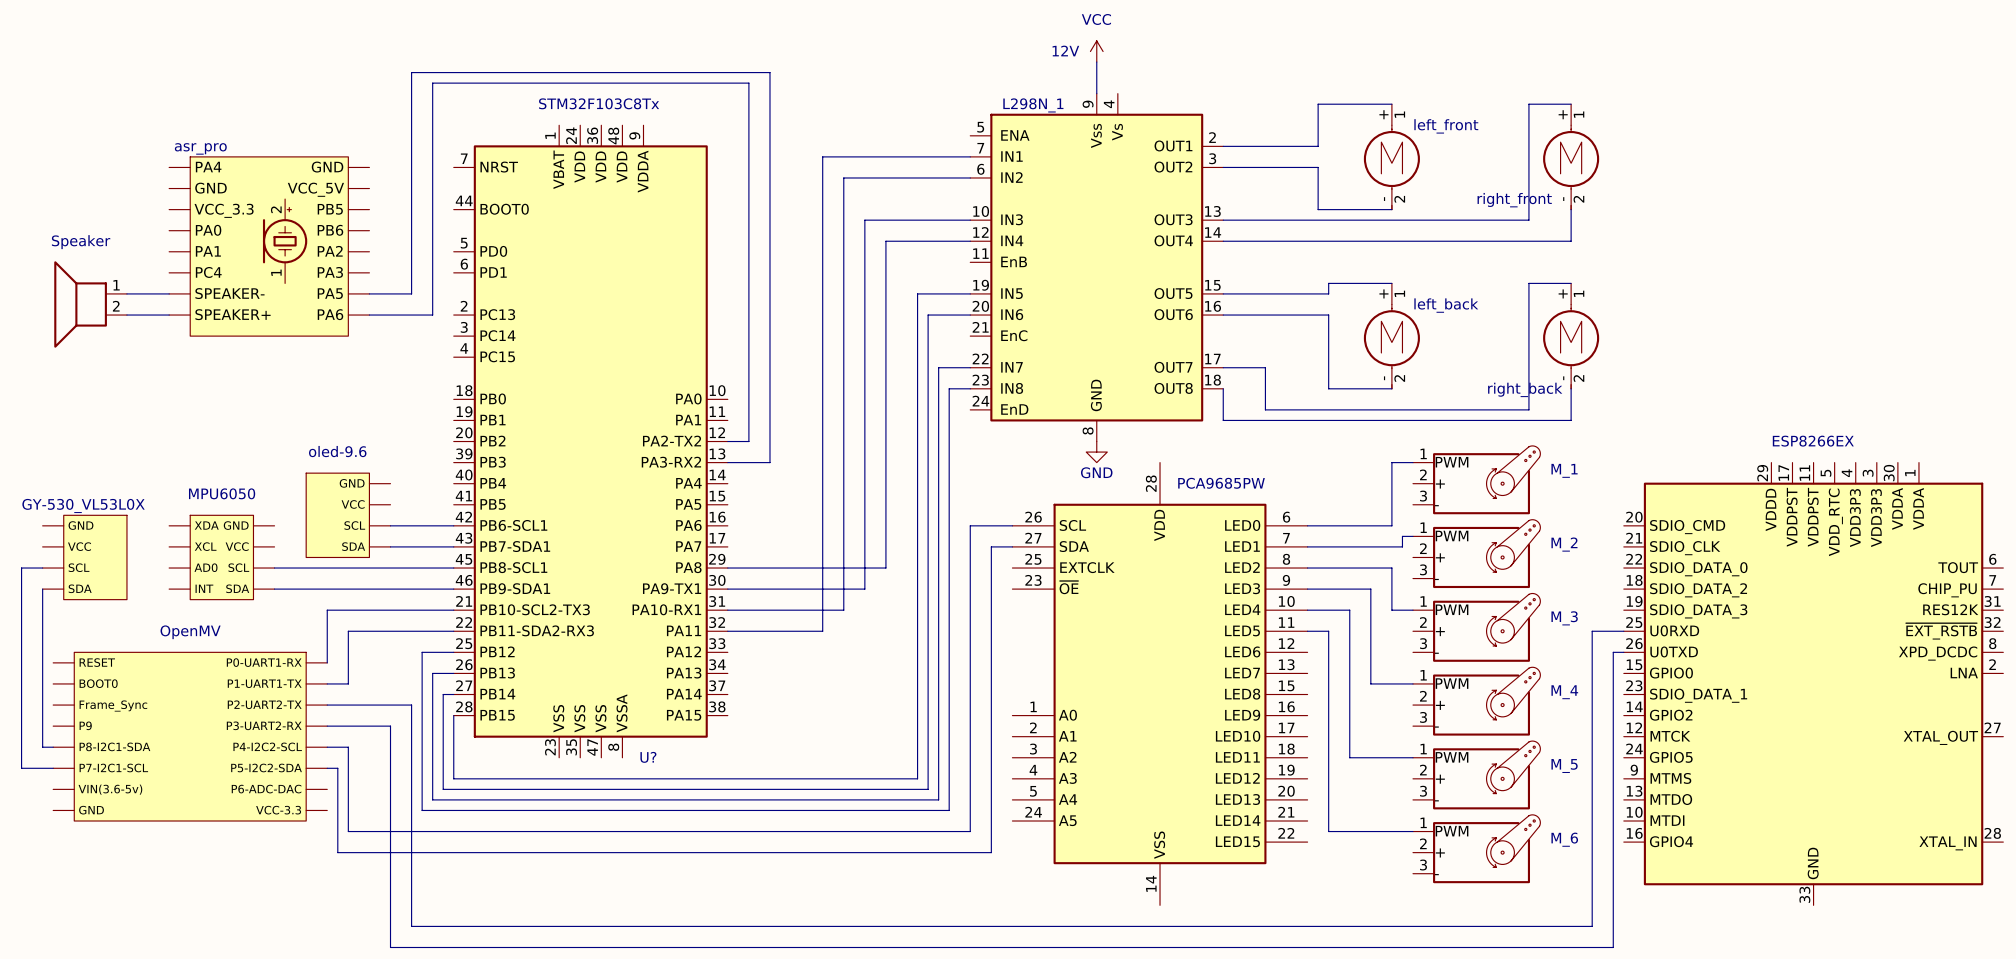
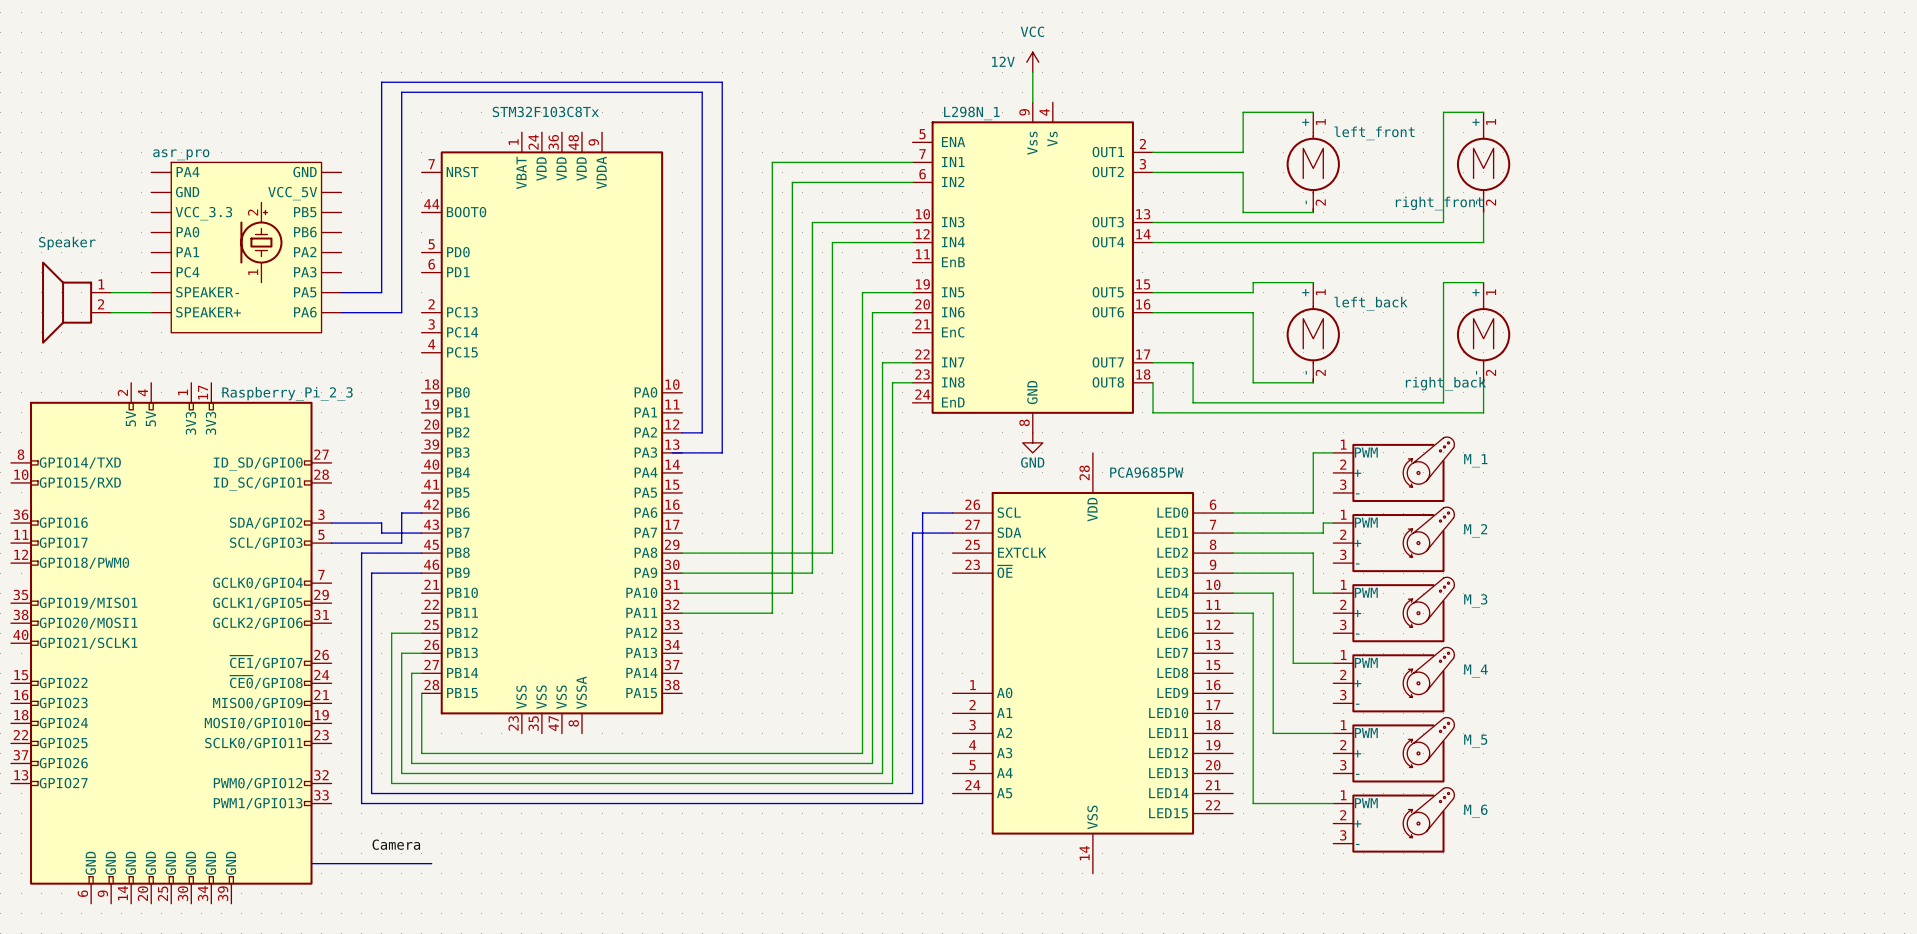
U? symbol: [453, 125, 728, 758] -> [421, 132, 683, 734]
bus: none -> (672, 452) (682, 452)
part: oled-9.6 (348, 515) -> none
bus: (390, 525) (432, 525) -> (331, 543) (401, 543) (401, 513)
bus: (980, 525) (970, 525) (970, 546) -> (932, 533) (912, 533)
bus: (390, 546) (411, 546) -> (331, 523) (381, 523) (381, 533)
bus: (991, 546) (991, 852) (337, 852) (337, 768) (327, 768) -> none
part: GY-530_VL53L0X (84, 557) -> none
part: MPU6050 (221, 557) -> none
bus: (42, 568) (21, 568) (21, 768) (53, 768) -> none
bus: (274, 568) (390, 568) -> none
bus: (42, 589) (42, 747) (53, 747) -> none
bus: (274, 589) (401, 589) -> (912, 793) (371, 793) (371, 573)
bus: (453, 610) (327, 610) (327, 662) -> none
bus: (453, 631) (348, 631) (348, 683) (327, 683) -> none
bus: (1623, 631) (1592, 631) (1592, 926) (411, 926) (411, 705) (327, 705) -> none
bus: (1623, 652) (1613, 652) (1613, 947) (390, 947) (390, 831) (348, 831) (348, 747) (327, 747) -> none
part: none -> Raspberry_Pi_2_3 (171, 643)
part: ESP8266EX (1813, 683) -> none
bus: (327, 726) (390, 726) -> (361, 553) (361, 703)
part: OpenMV (190, 736) -> none
U? name: U? (648, 757) -> none
bus: (970, 821) (970, 831) -> (922, 513) (922, 803) (912, 803)
label: none -> Camera (396, 844)
bus: none -> (311, 863) (431, 863)

